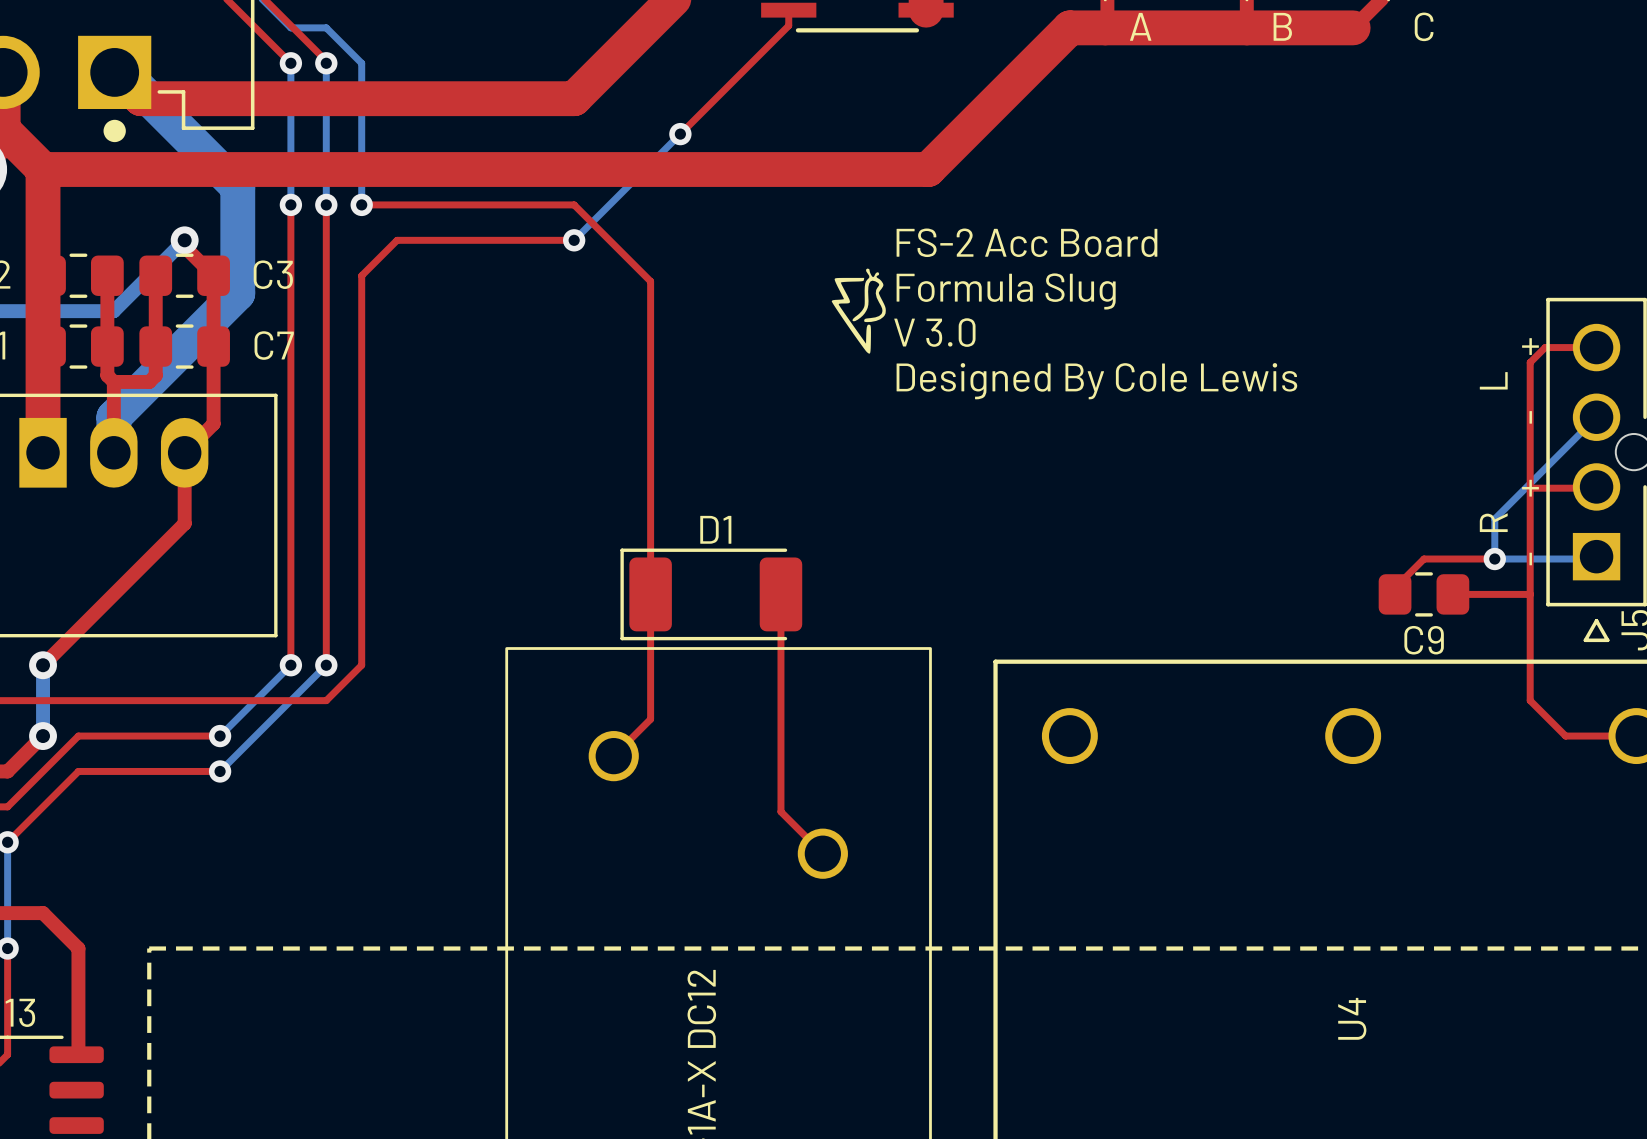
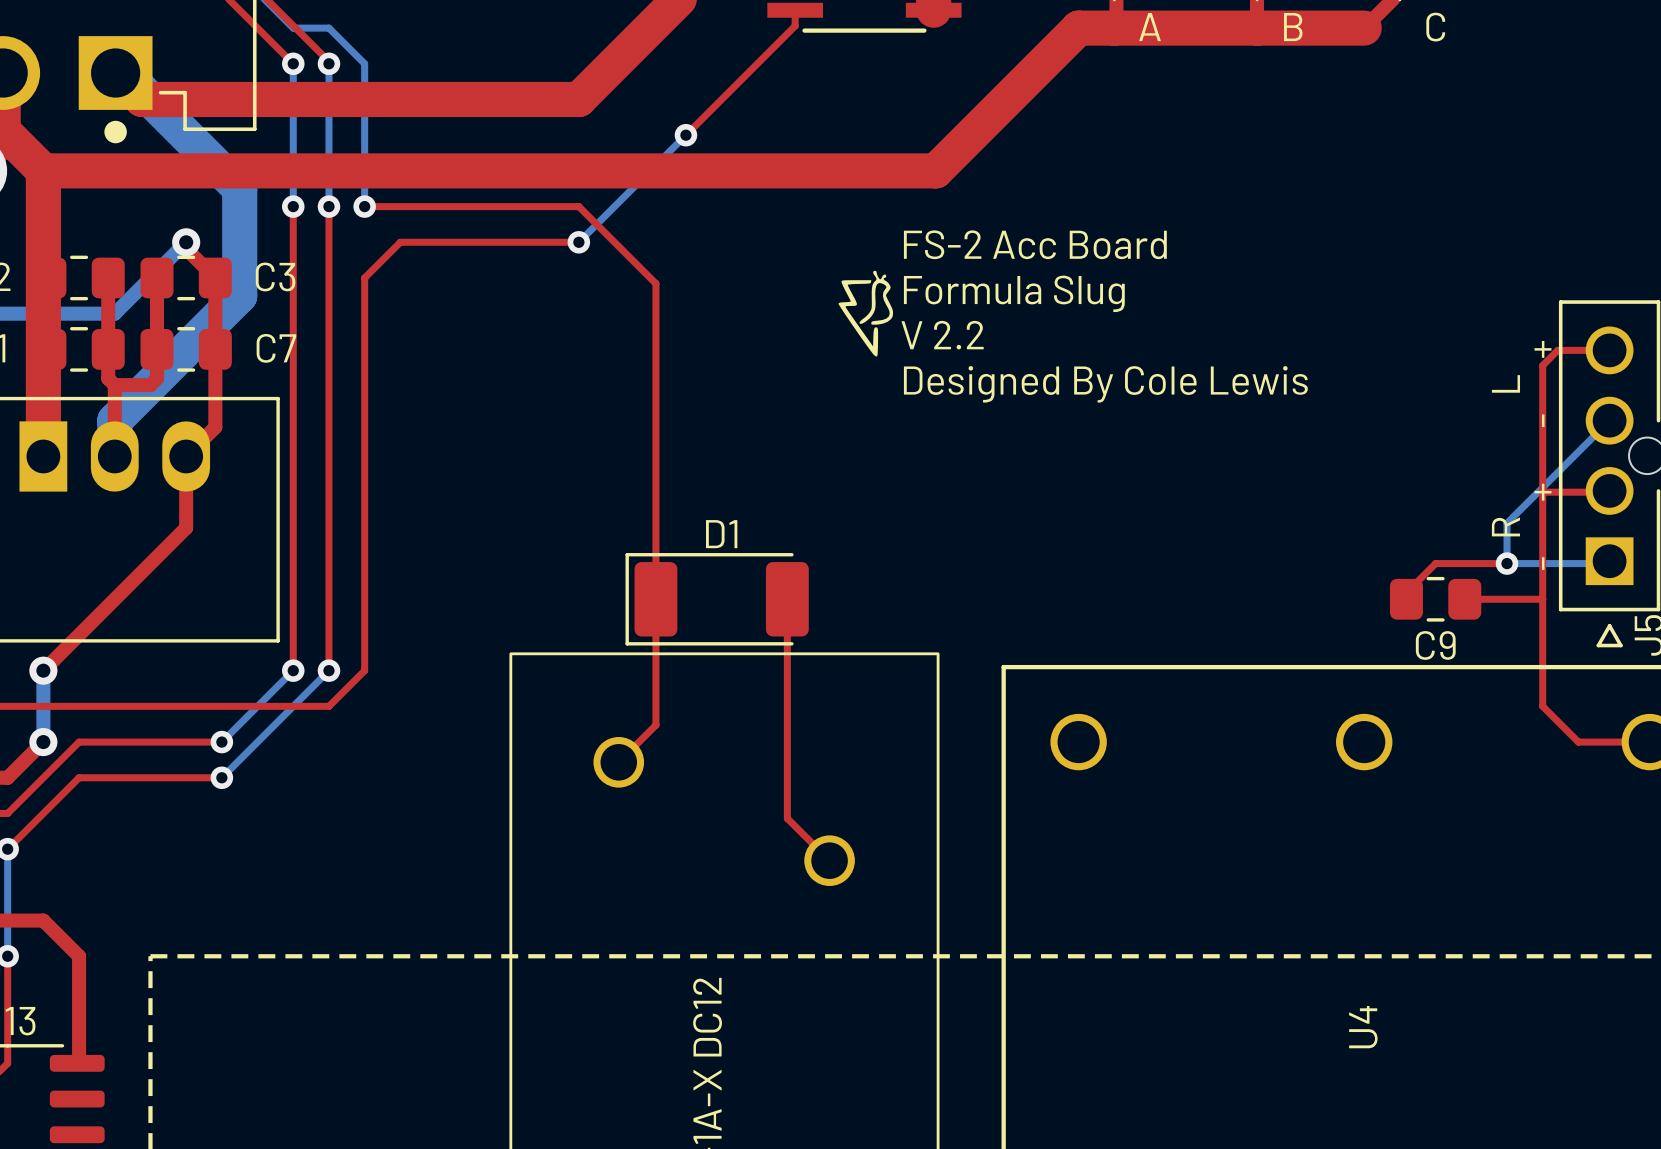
text: V 3.0 (934, 332) -> V 2.2 (942, 335)

